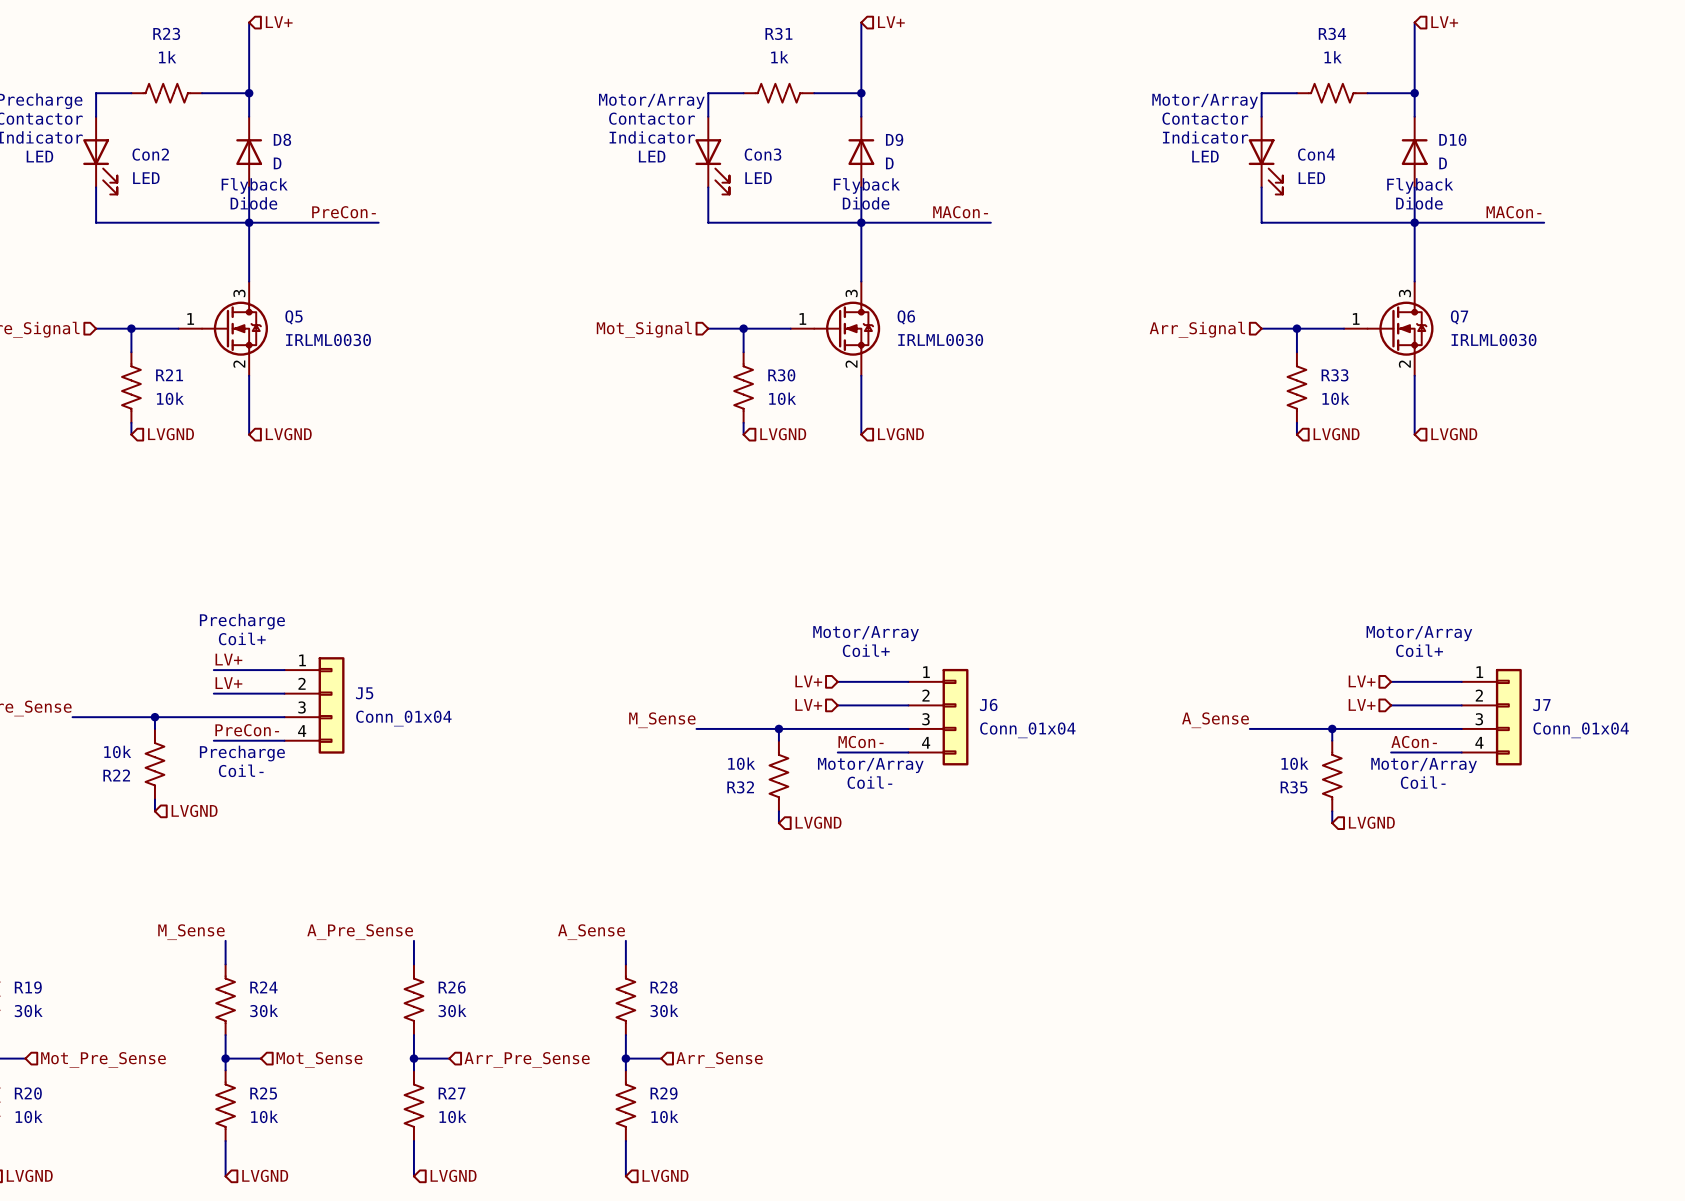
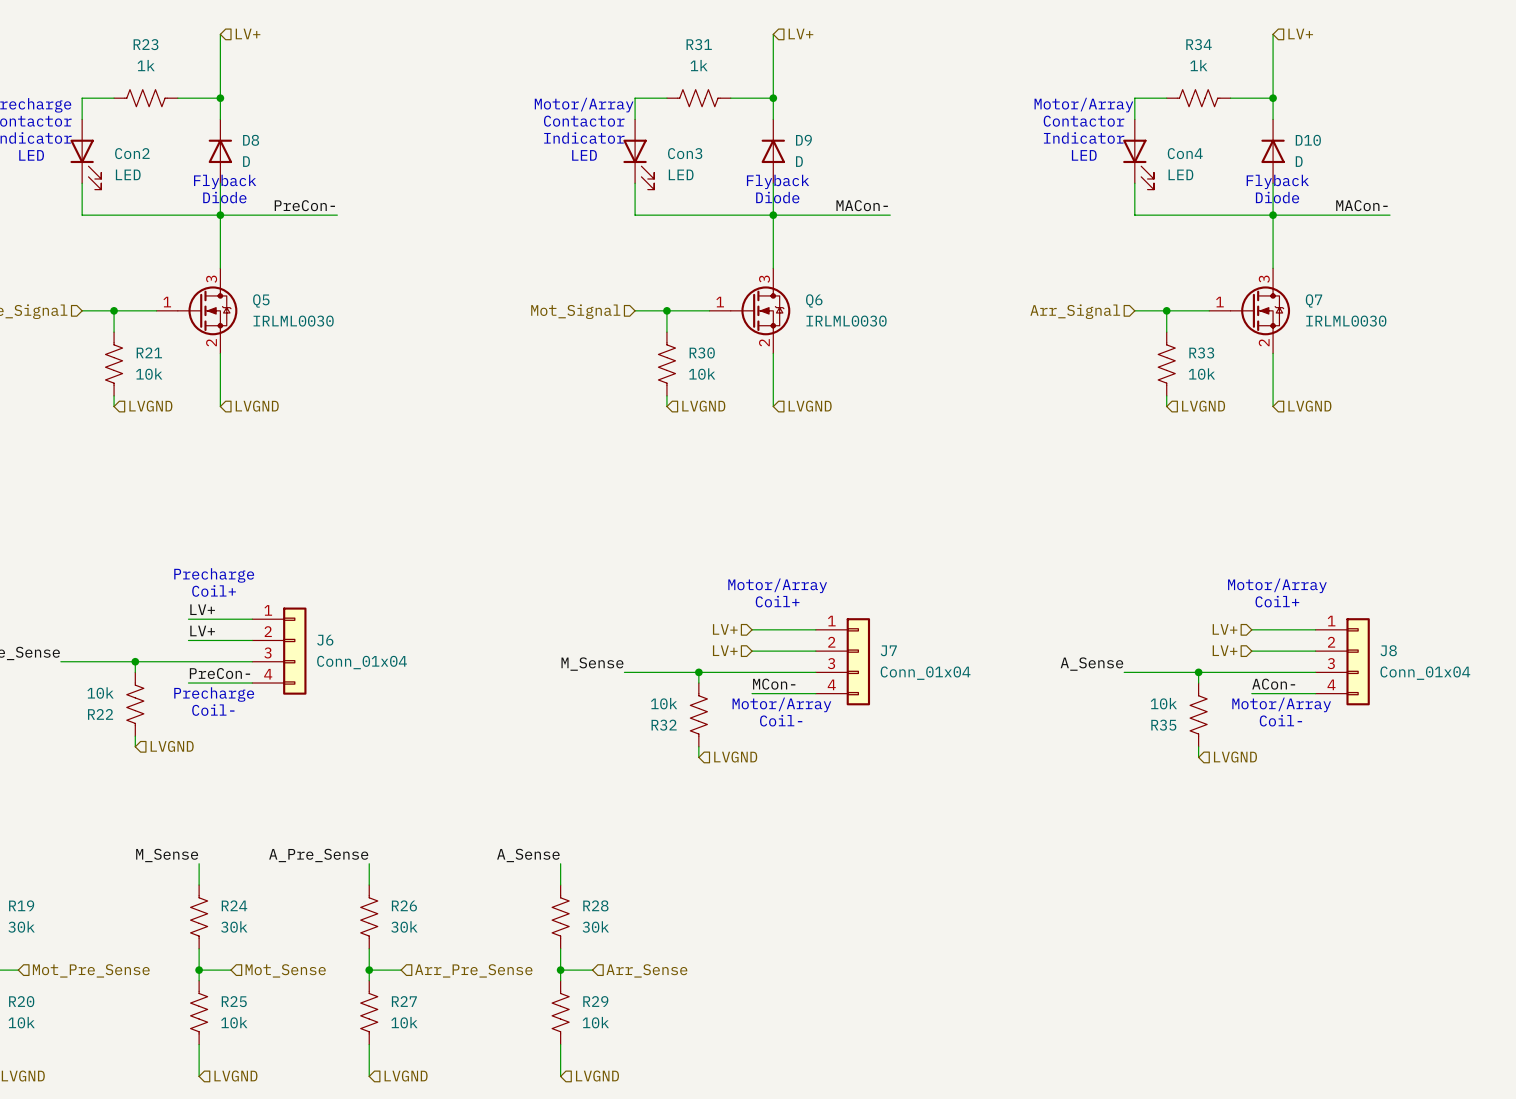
J5 name: J5 (364, 693) -> J6 (325, 640)
J6 name: J6 (988, 704) -> J7 (888, 650)
J7 name: J7 (1541, 705) -> J8 (1388, 650)

